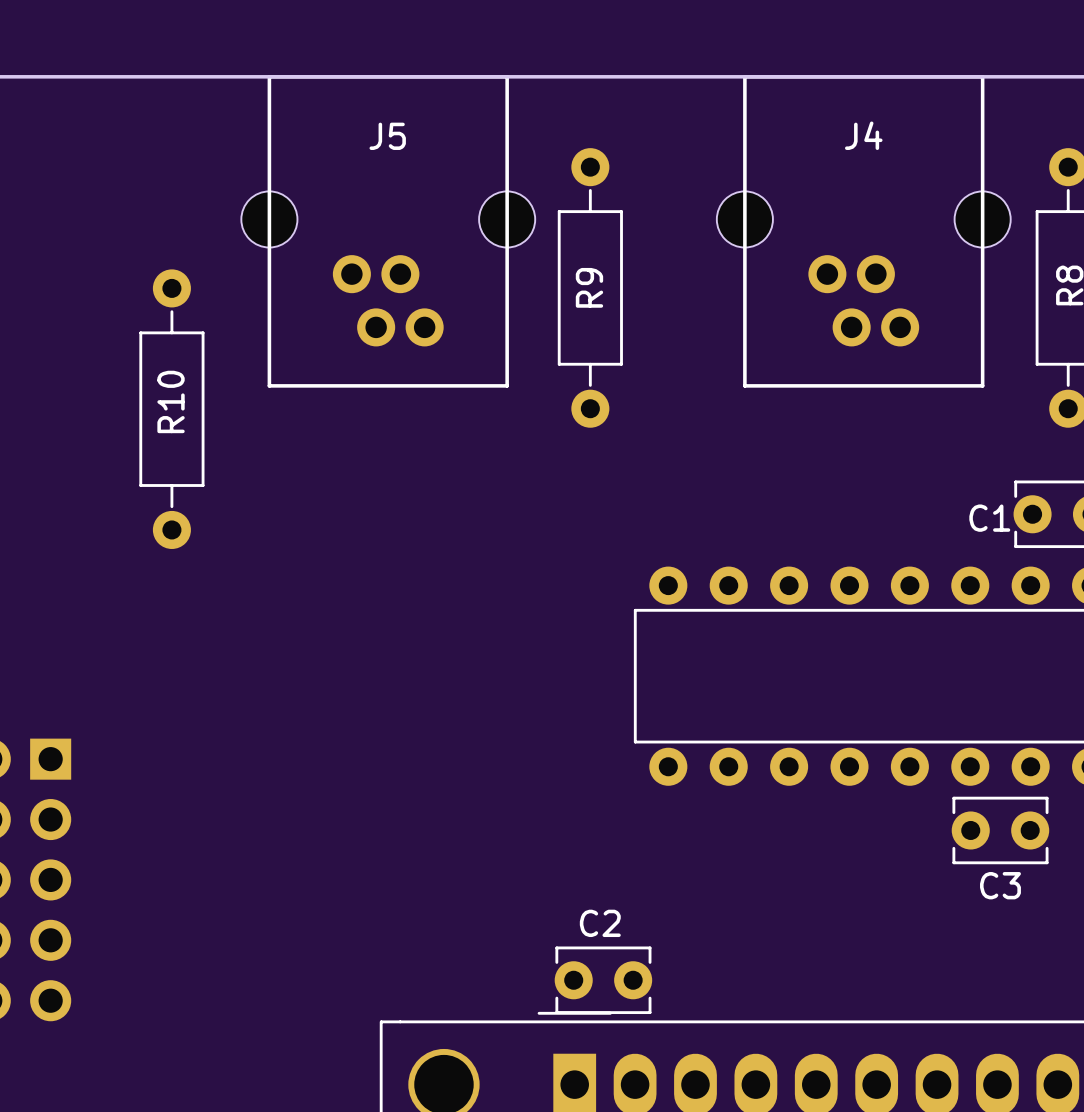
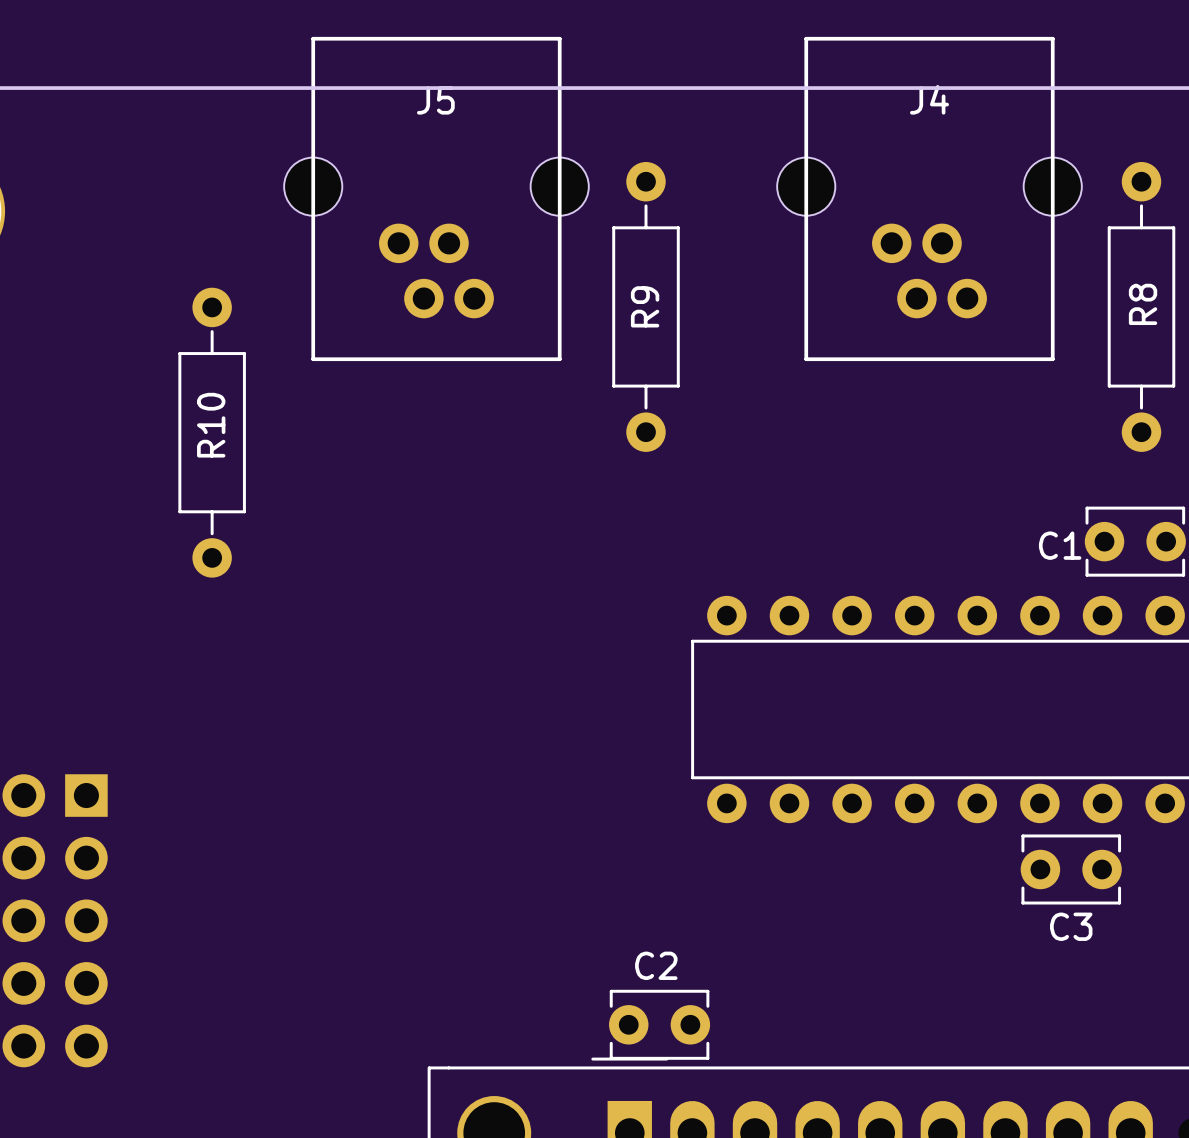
J5 position: (388, 231) -> (436, 198)
J4 position: (863, 231) -> (929, 198)

